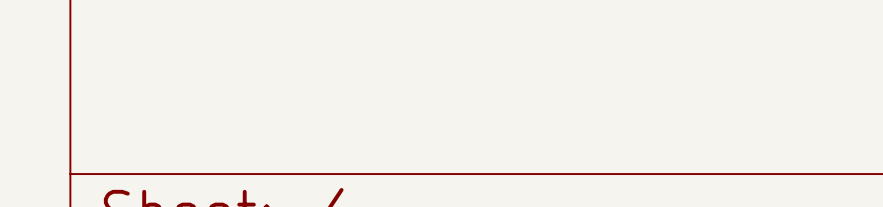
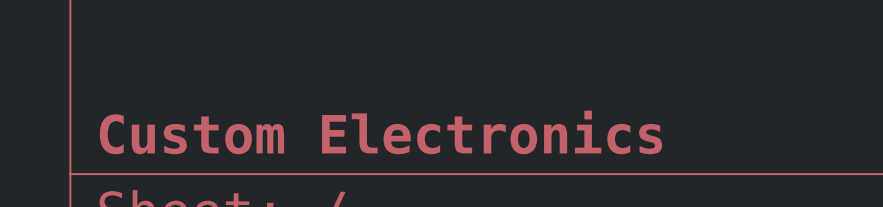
title block: none -> Custom Electronics (380, 132)

